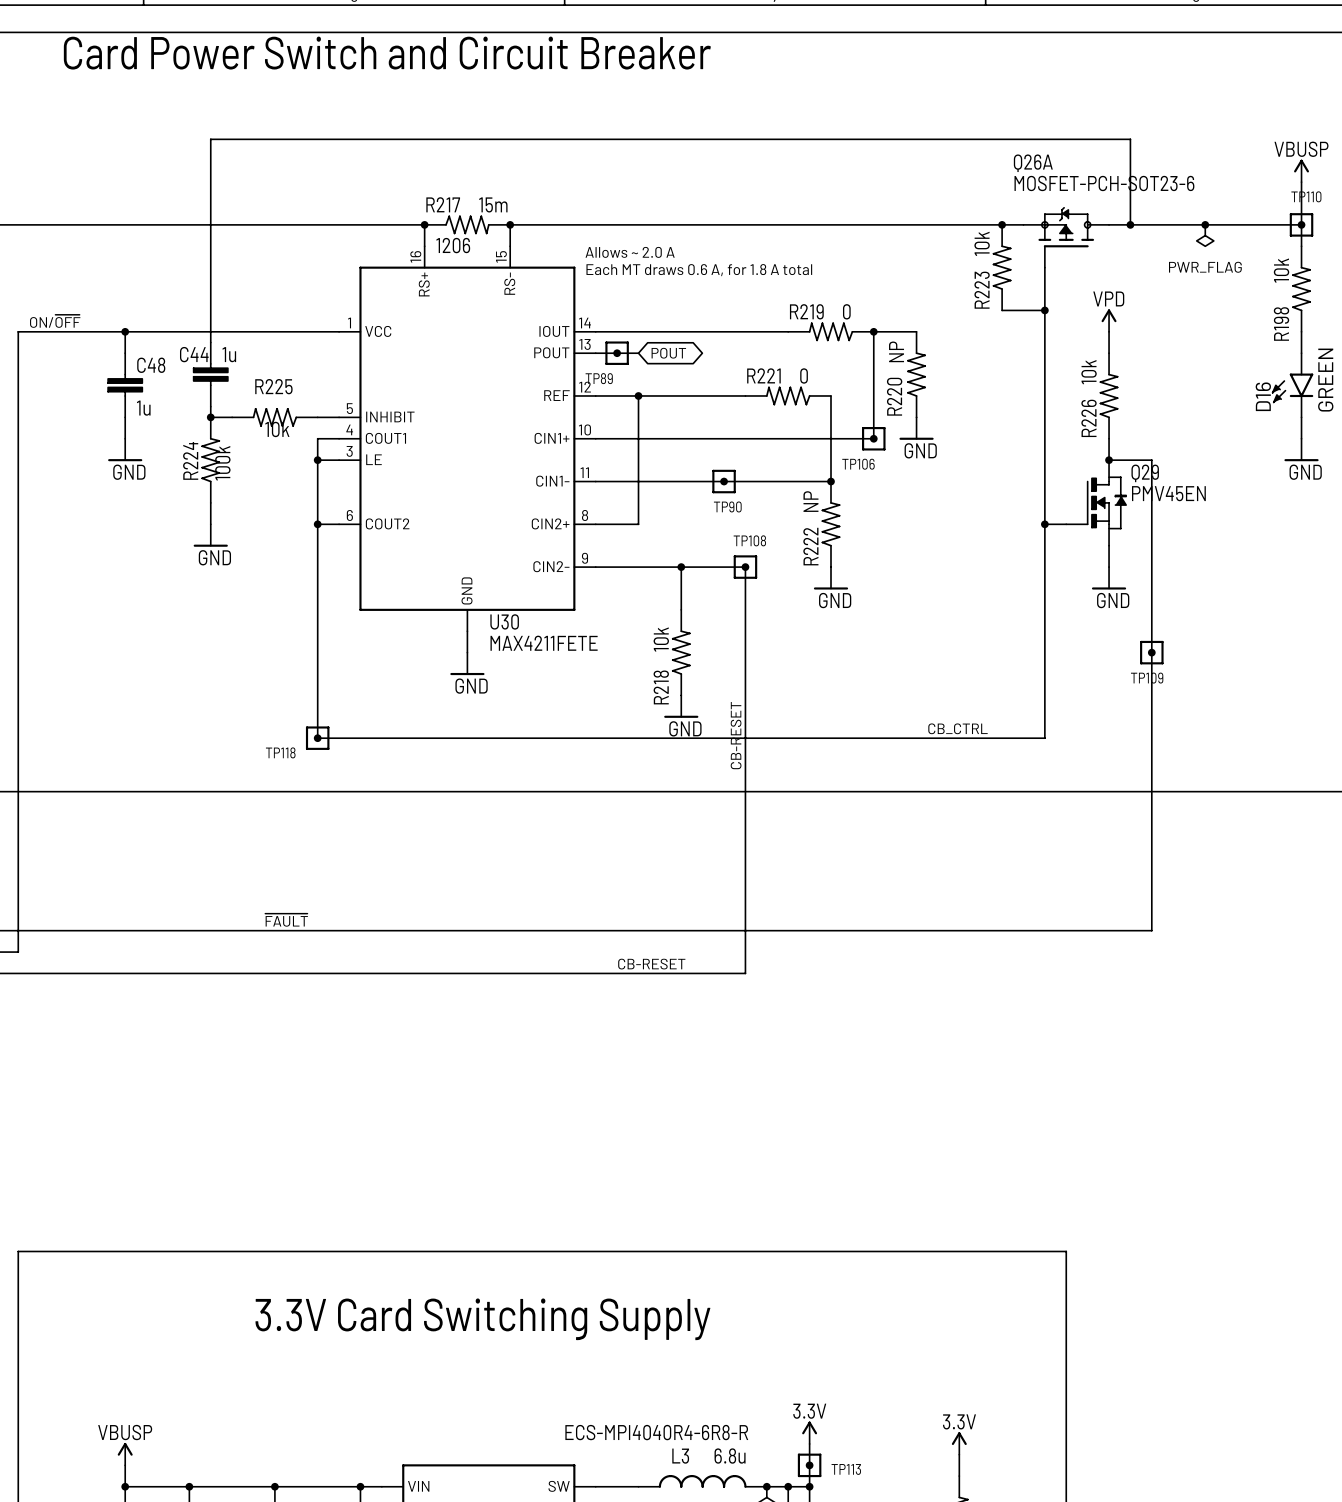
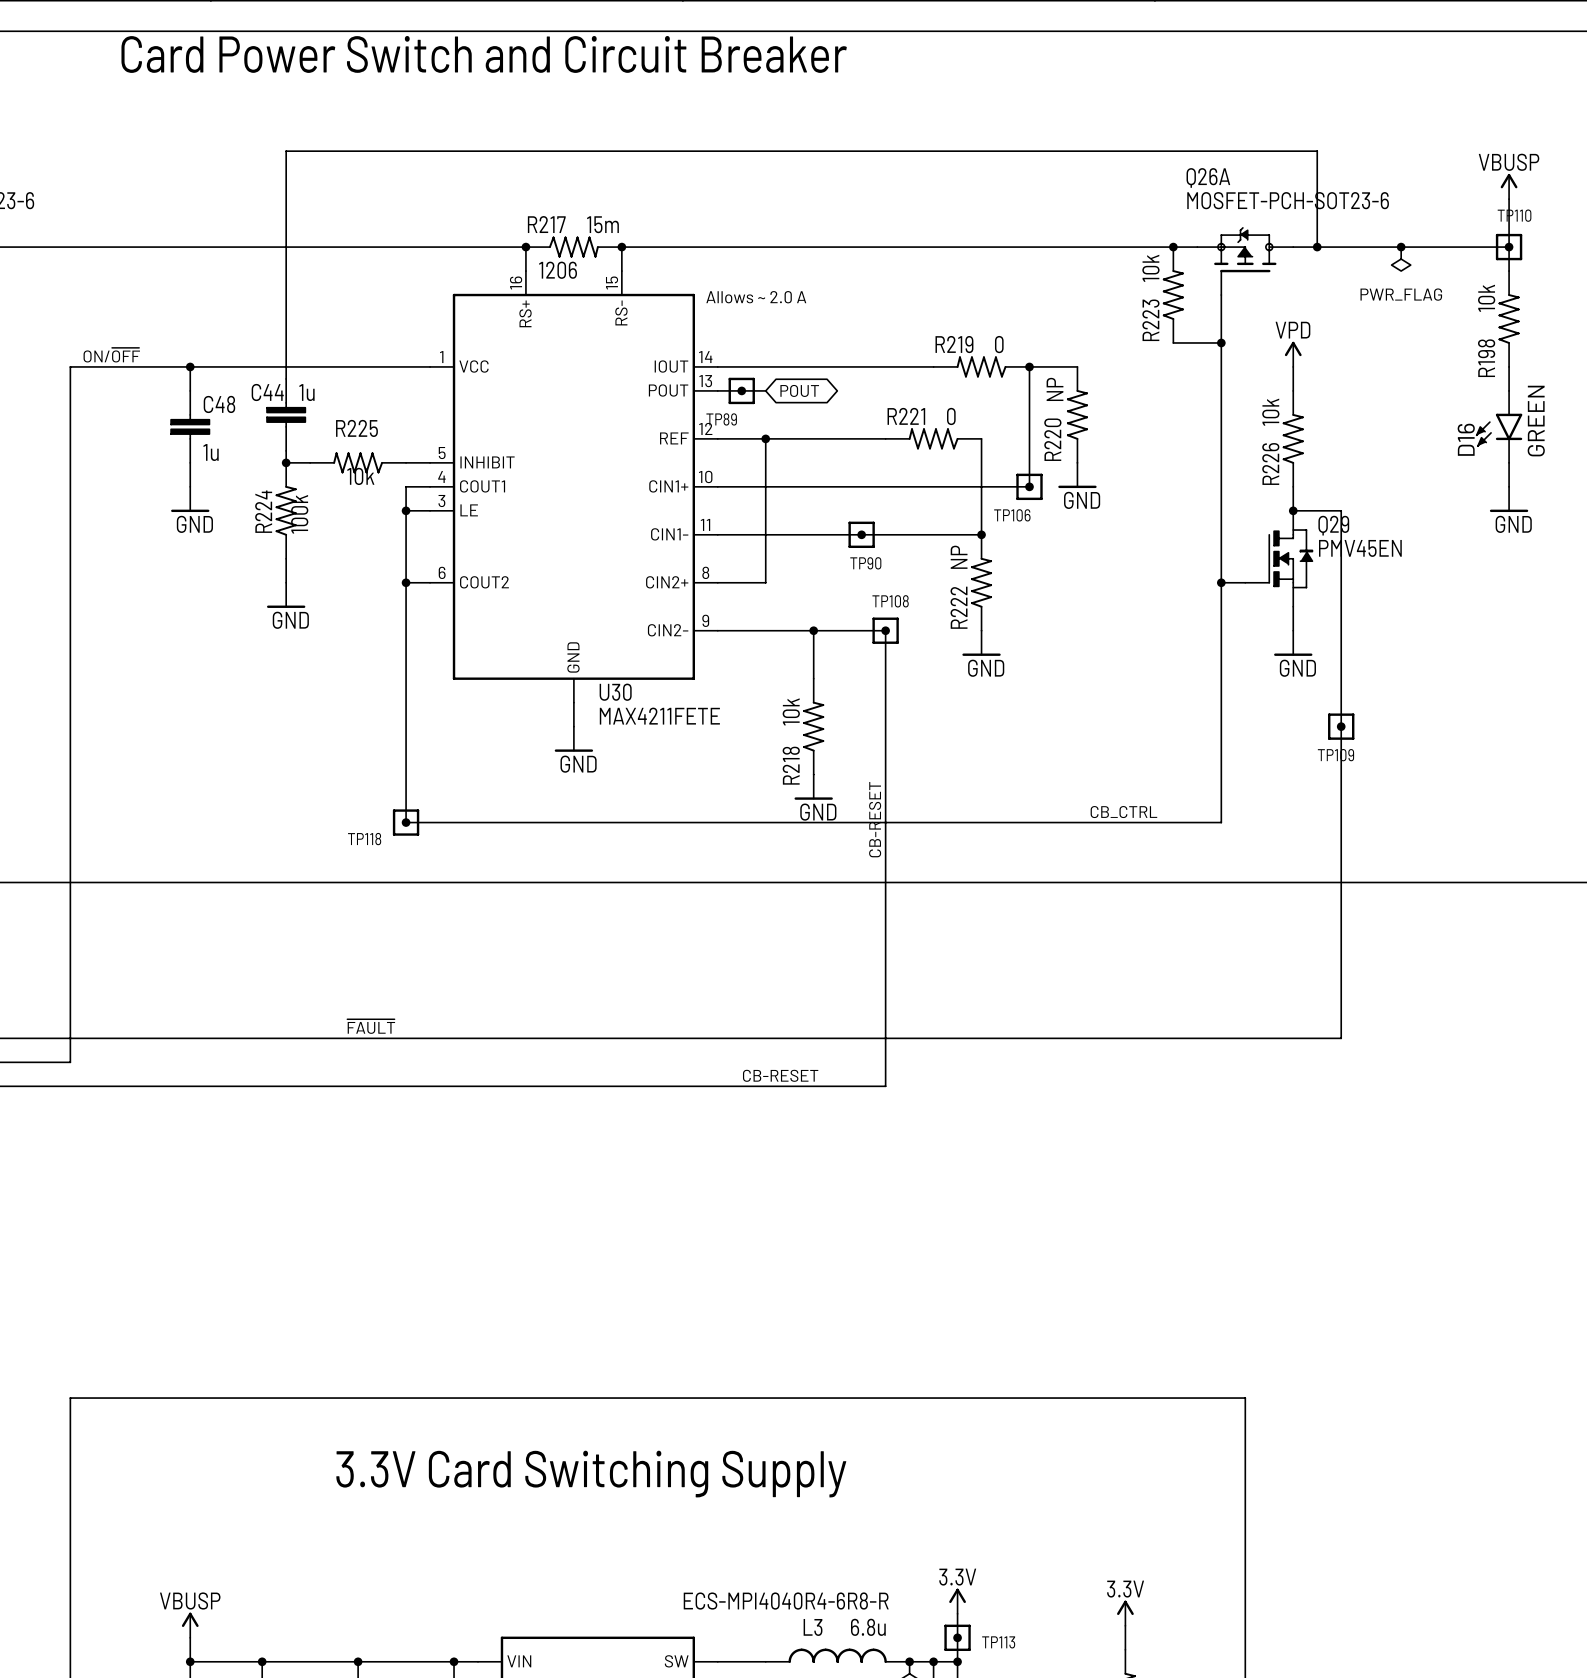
text: Allows ~ 2.0 A (630, 252) -> none
text: Each MT draws 0.6 A, for 1.8 A total (699, 270) -> Allows ~ 2.0 A (756, 297)

